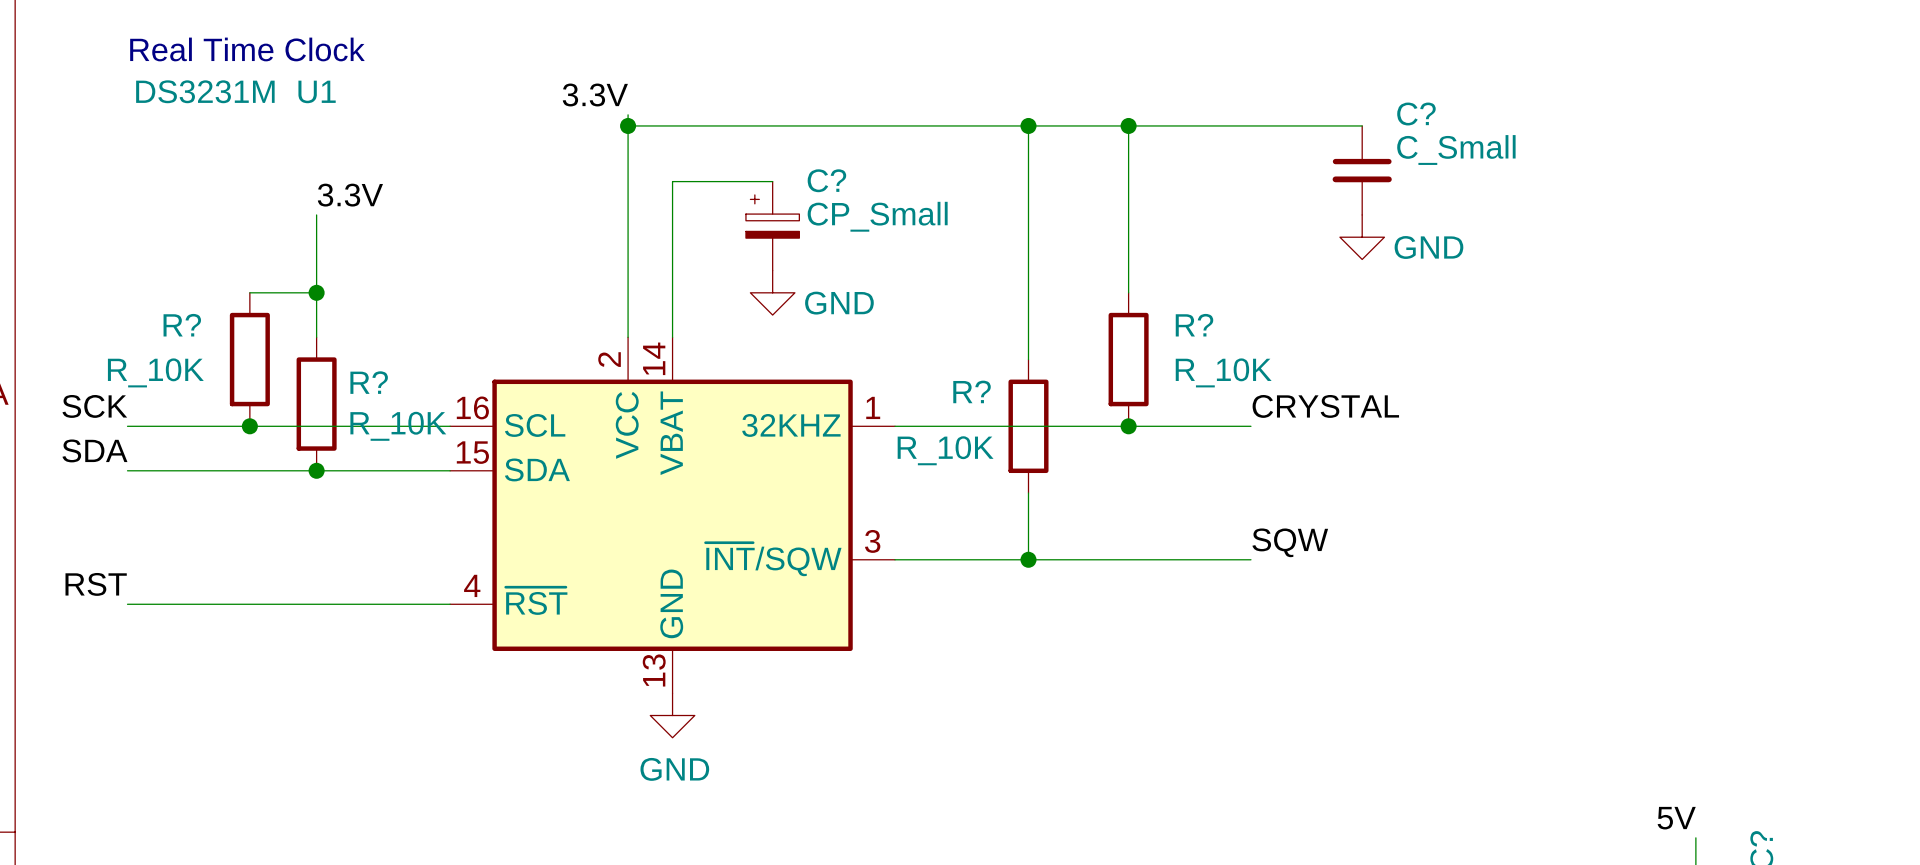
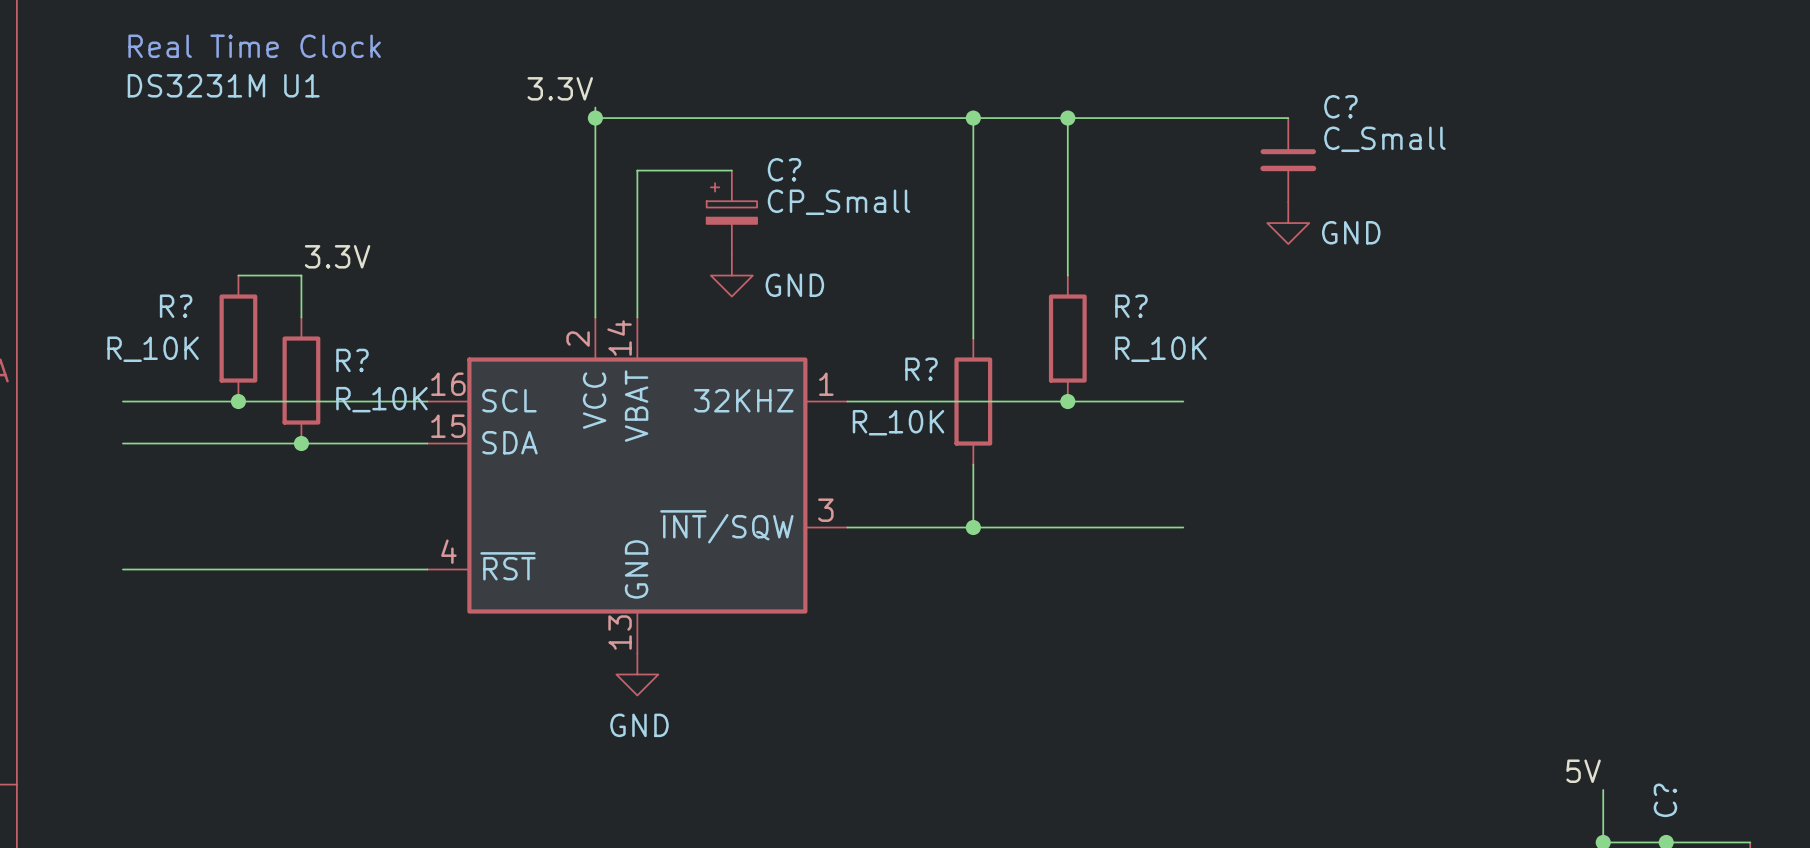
label position: 3.3V (350, 195) -> 3.3V (337, 256)
wire: (316, 214) (316, 292) -> none
junction: (316, 292) -> none
label: SCK (94, 406) -> none
label: CRYSTAL (1325, 406) -> none
label: SDA (94, 450) -> none
label: SQW (1290, 542) -> none
label: RST (96, 584) -> none

